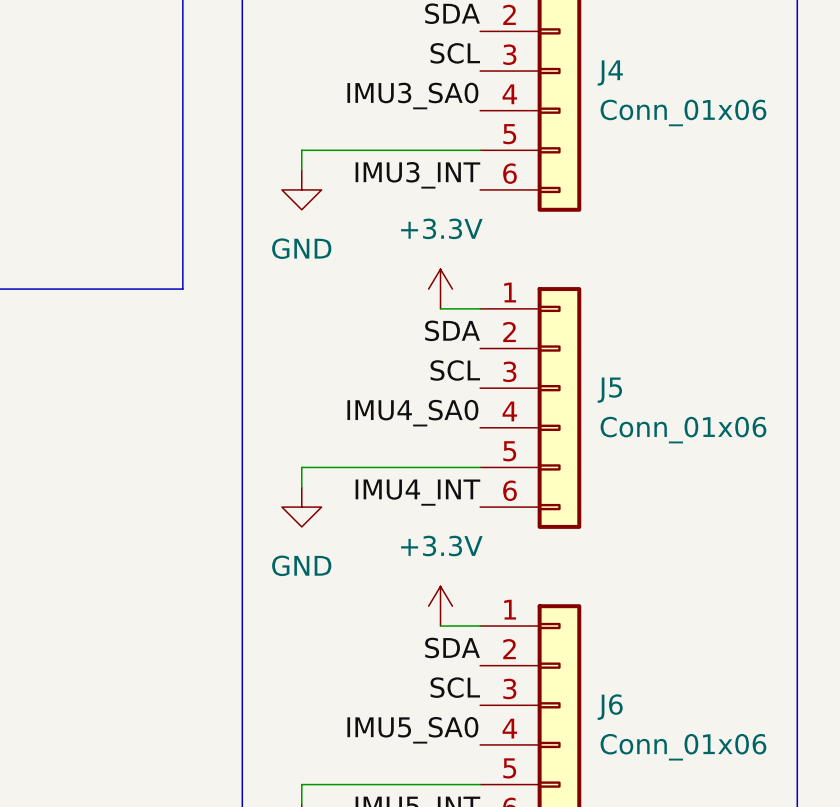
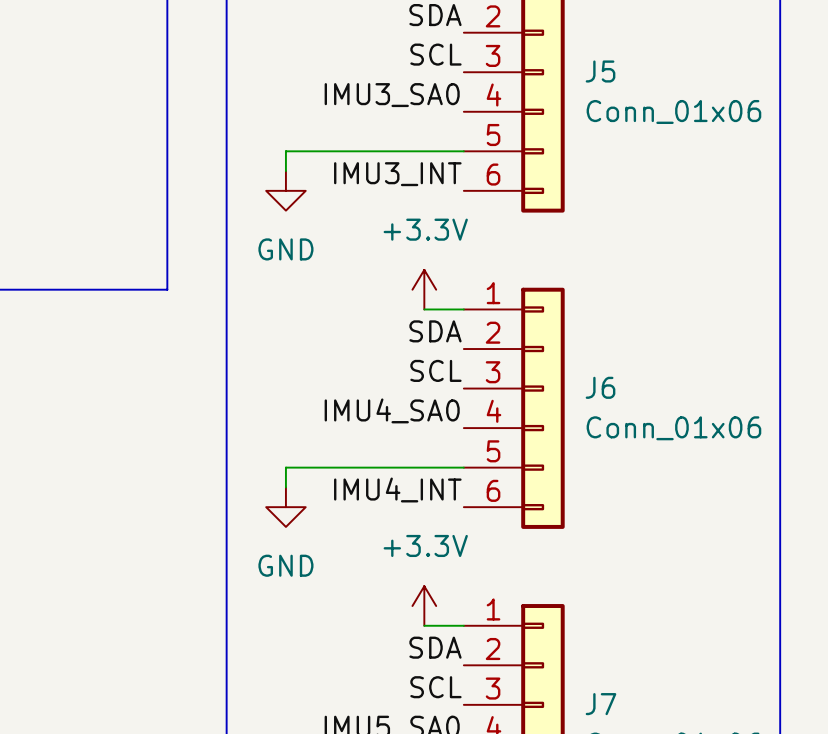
J4 name: J4 (610, 73) -> J5 (600, 71)
J5 name: J5 (609, 390) -> J6 (600, 387)
J6 name: J6 (610, 707) -> J7 (600, 704)

